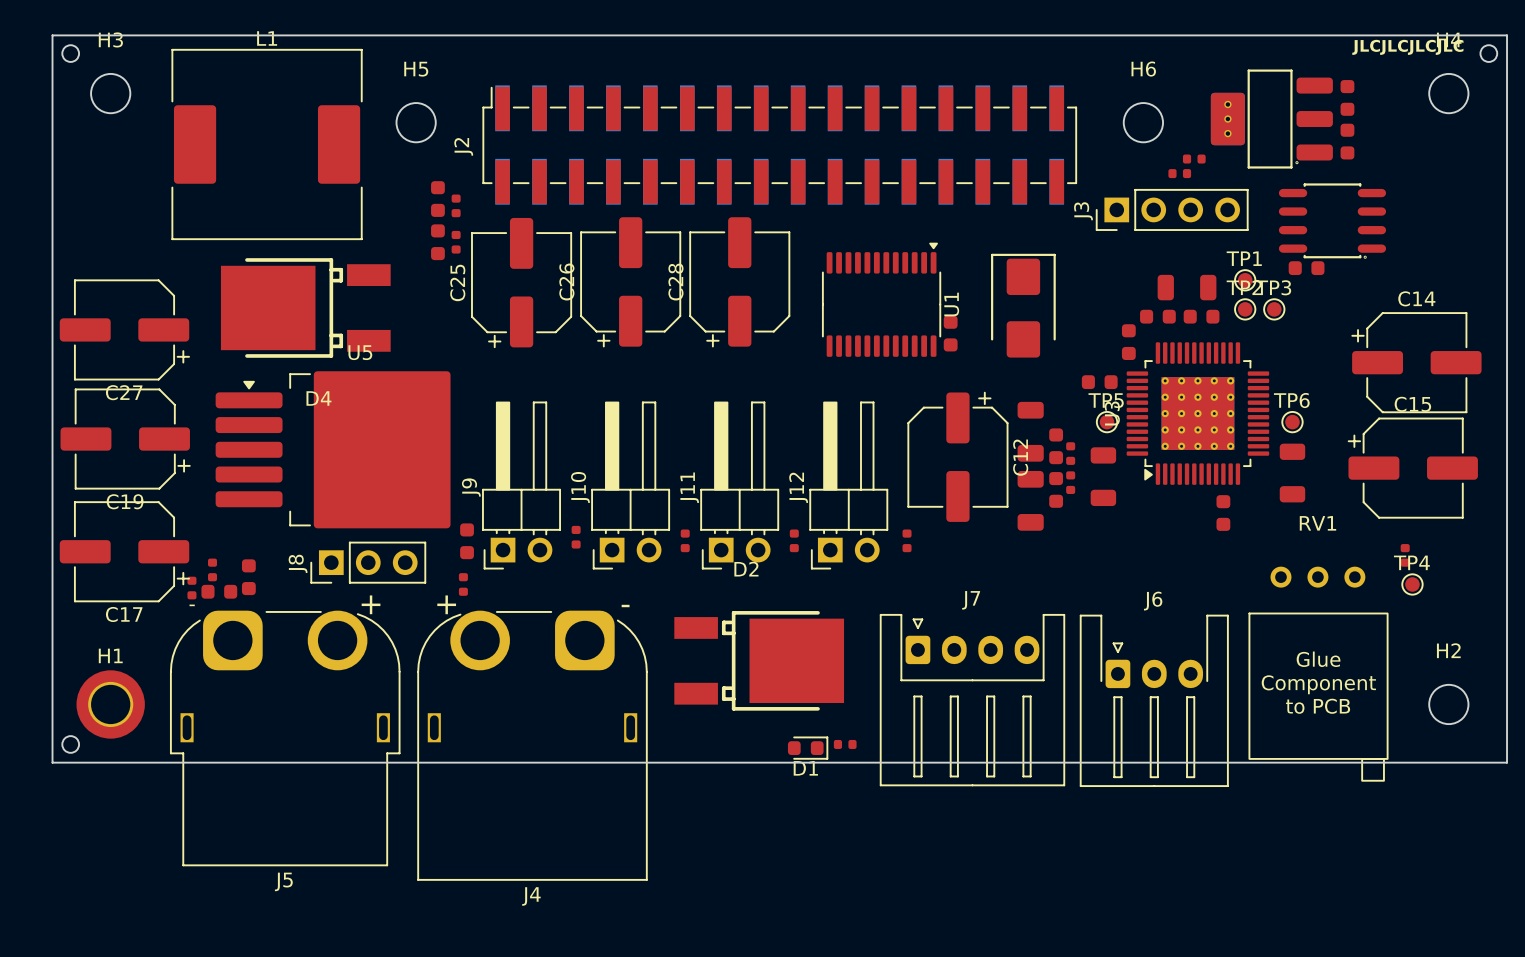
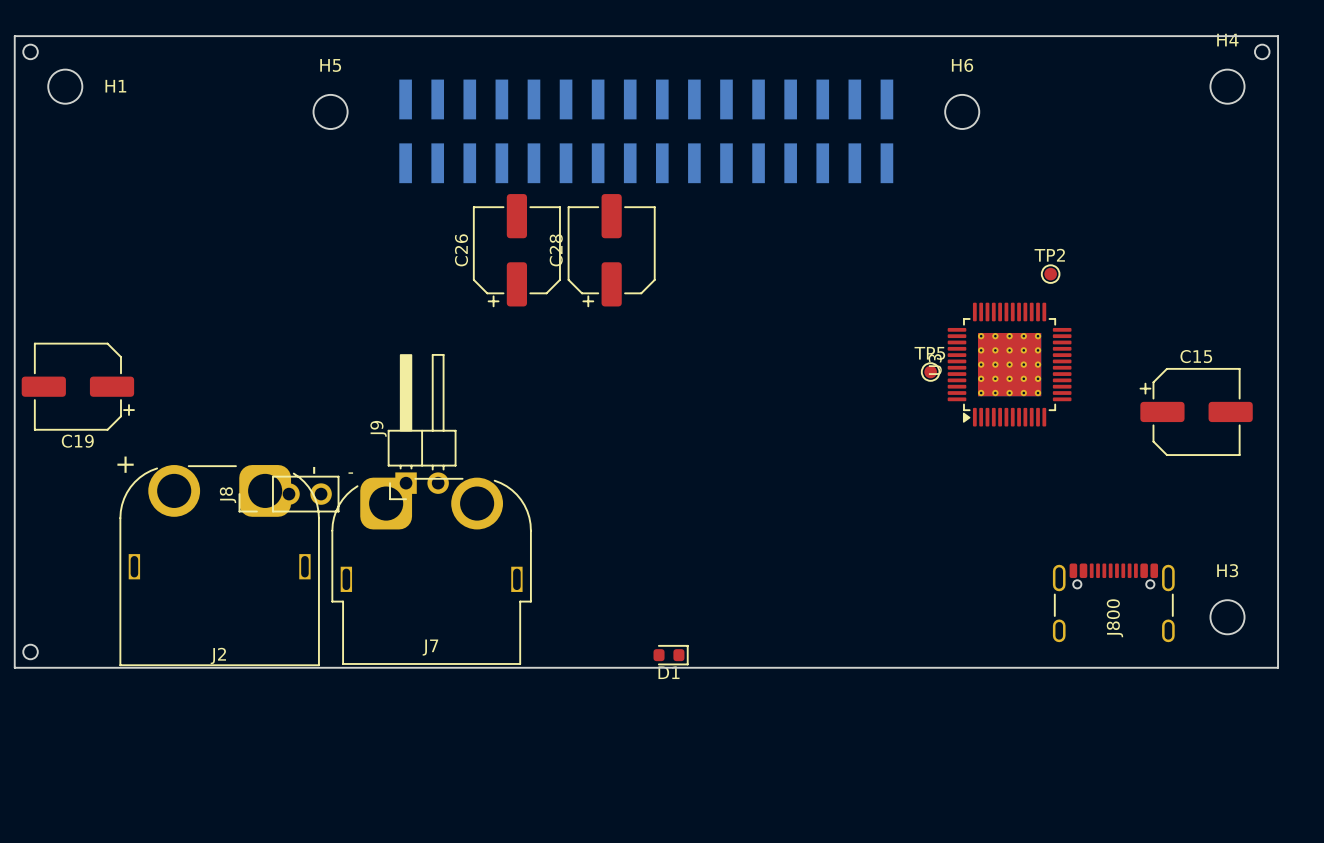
H3 name: H3 (110, 39) -> H1 (115, 86)
drawing: [1352, 39, 1464, 55] -> none
J2 footprint: [482, 86, 1078, 204] -> [119, 465, 320, 667]
part: (1347, 97) -> none
part: (1271, 119) -> none
part: (1347, 141) -> none
L1: (267, 144) -> none
J2 name position: J2 (463, 146) -> J2 (218, 655)
part: (1194, 159) -> none
part: (1179, 173) -> none
part: (437, 199) -> none
part: (456, 205) -> none
J3: (1172, 209) -> none
part: (1332, 221) -> none
part: (437, 242) -> none
part: (456, 242) -> none
part: (1306, 268) -> none
TP1: (1245, 280) -> none
C25: (521, 283) -> none
part: (1187, 287) -> none
U1: (881, 299) -> none
part: (1023, 305) -> none
TP3: (1274, 309) -> none
D4: (305, 310) -> none
part: (1157, 316) -> none
part: (1201, 316) -> none
C27: (124, 329) -> none
part: (950, 333) -> none
part: (1128, 342) -> none
C14: (1416, 362) -> none
part: (1099, 382) -> none
TP6: (1292, 422) -> none
part: (1030, 431) -> none
part: (1056, 446) -> none
U5: (333, 449) -> none
part: (1070, 453) -> none
C12: (957, 456) -> none
part: (1292, 473) -> none
part: (1103, 476) -> none
part: (1070, 482) -> none
J10: (630, 485) -> none
J11: (739, 485) -> none
J12: (848, 485) -> none
part: (1056, 489) -> none
part: (1030, 500) -> none
part: (1223, 513) -> none
part: (576, 537) -> none
part: (685, 540) -> none
part: (794, 540) -> none
part: (907, 540) -> none
part: (467, 541) -> none
C17: (124, 551) -> none
part: (1405, 555) -> none
part: (212, 569) -> none
part: (248, 577) -> none
part: (463, 584) -> none
TP4: (1412, 584) -> none
part: (191, 588) -> none
part: (219, 591) -> none
J7 name position: J7 (971, 600) -> J7 (430, 647)
J7 footprint: [879, 614, 1066, 787] -> [331, 477, 532, 665]
H2 name: H2 (1448, 650) -> H3 (1227, 570)
D2: (759, 658) -> none
RV1: (1318, 674) -> none
J800: none -> (1113, 602)
J6: (1154, 700) -> none
H1: (110, 704) -> none
J5: (285, 738) -> none
part: (845, 744) -> none
J4: (532, 745) -> none

